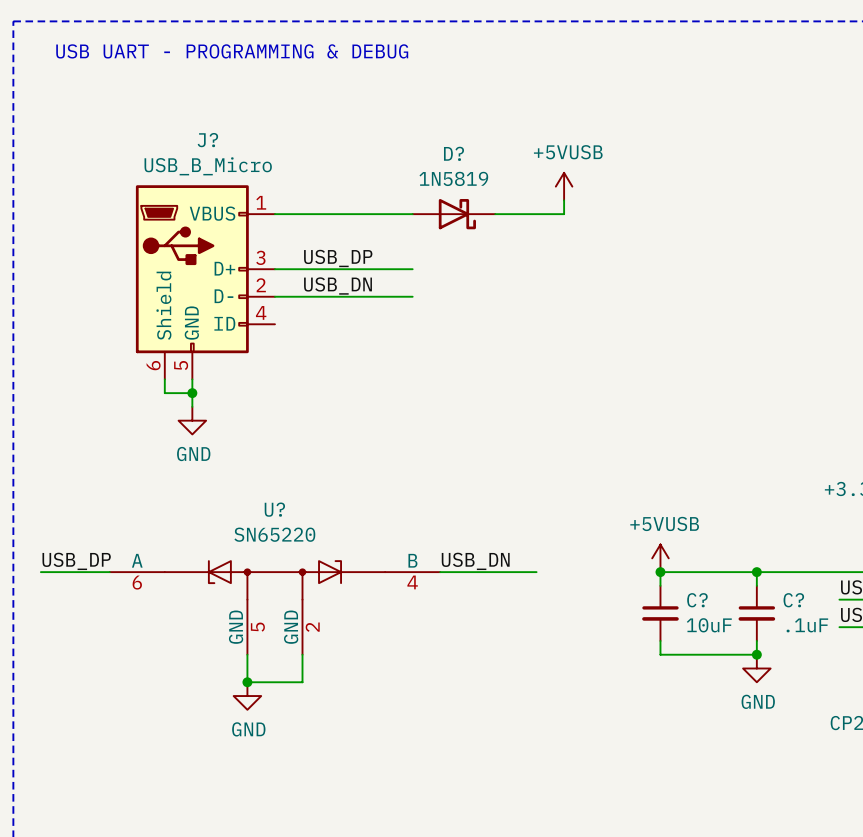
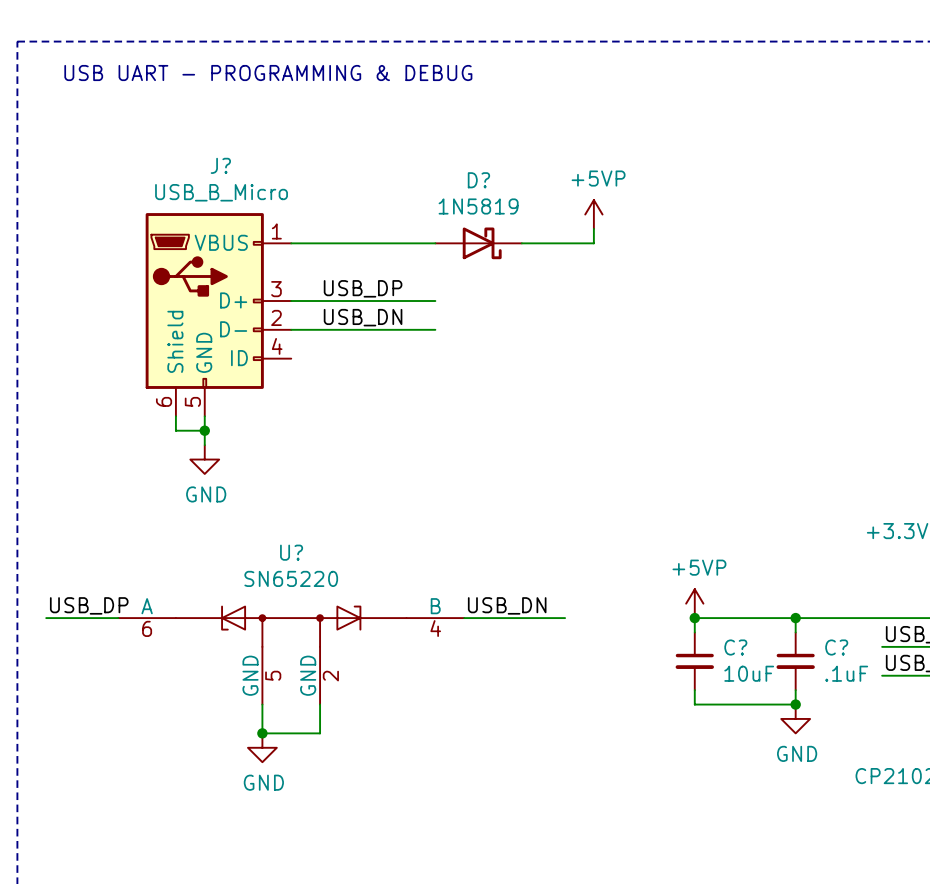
power symbol: +5VUSB (564, 186) -> +5VP (593, 214)
power symbol: +5VUSB (660, 558) -> +5VP (694, 603)

